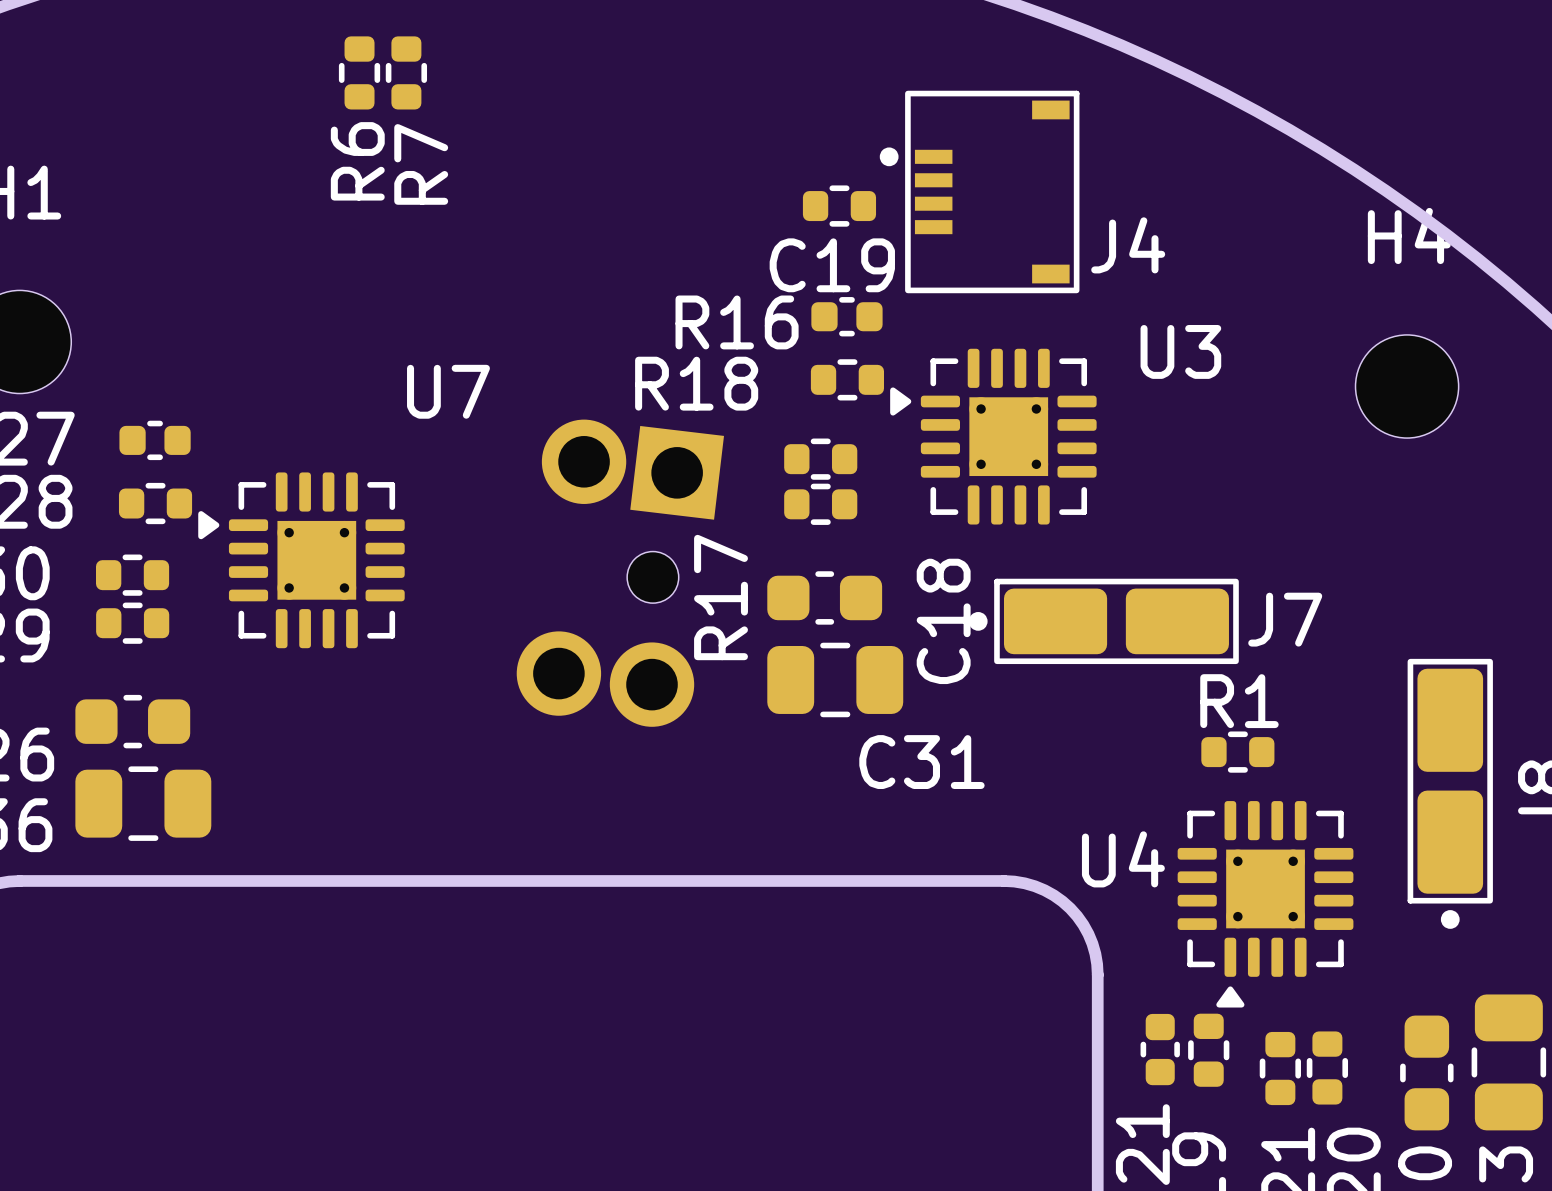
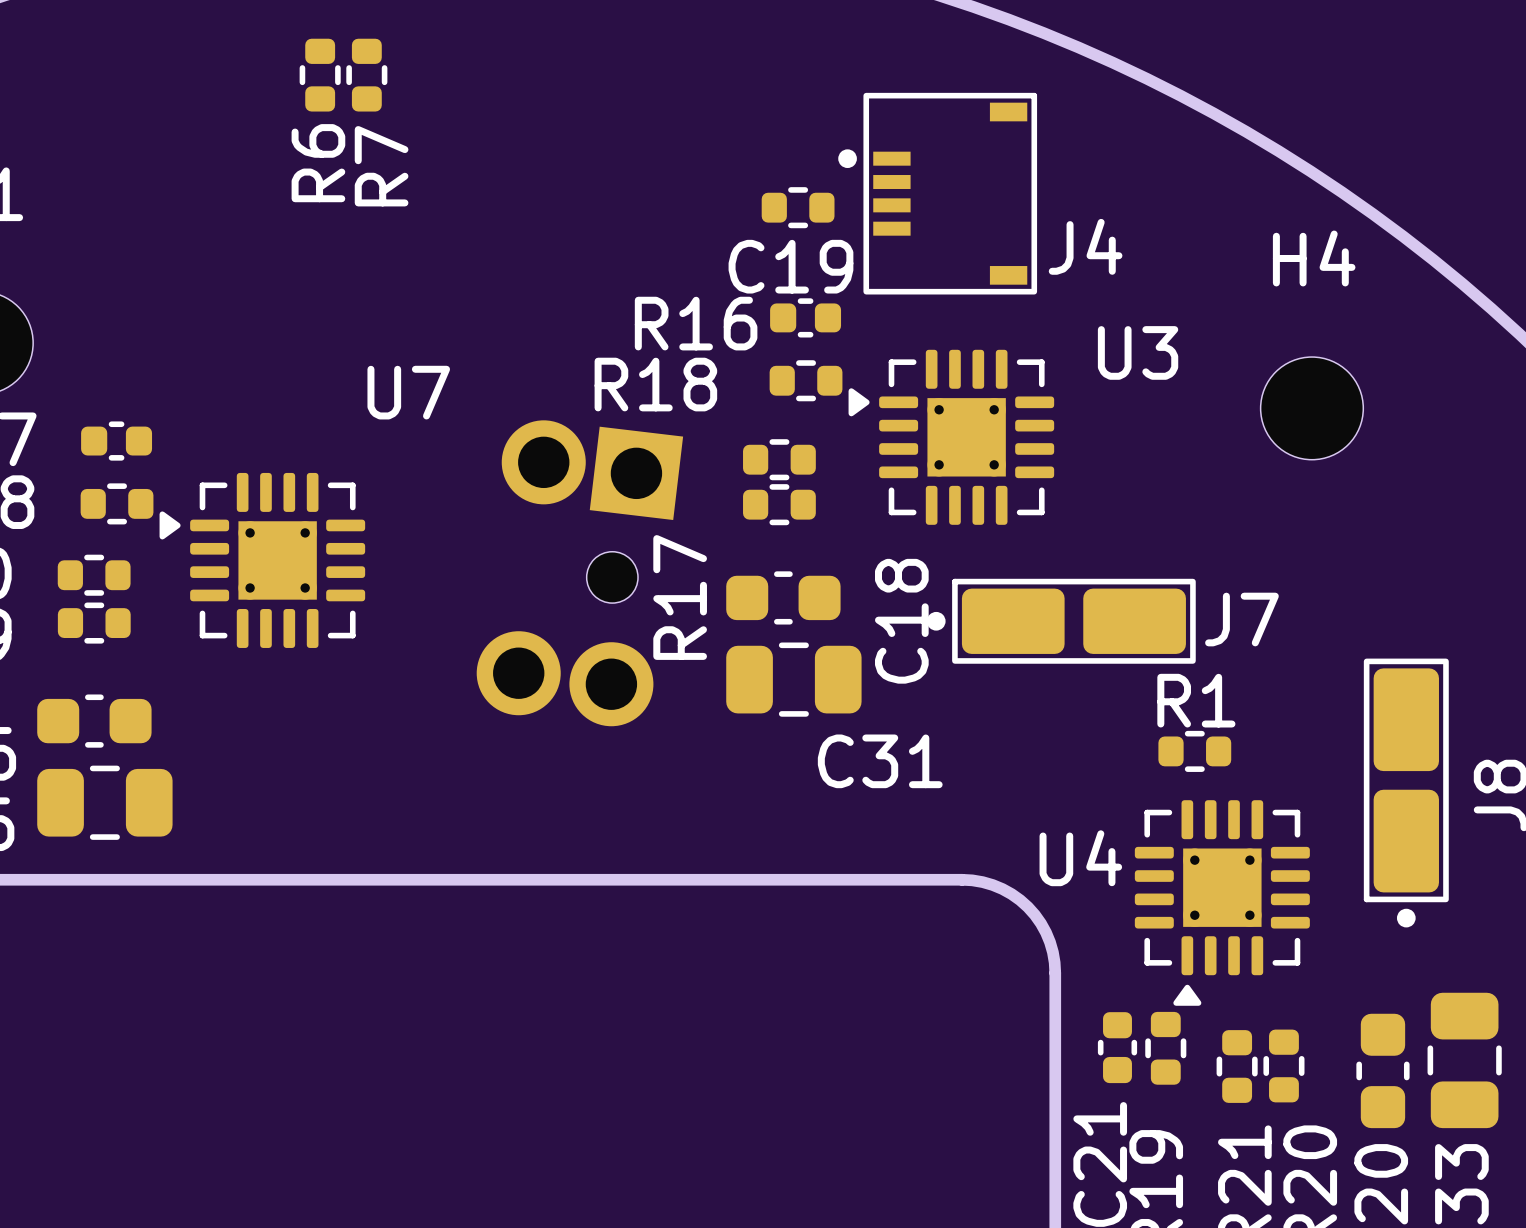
H4 position: (1407, 386) -> (1311, 408)

